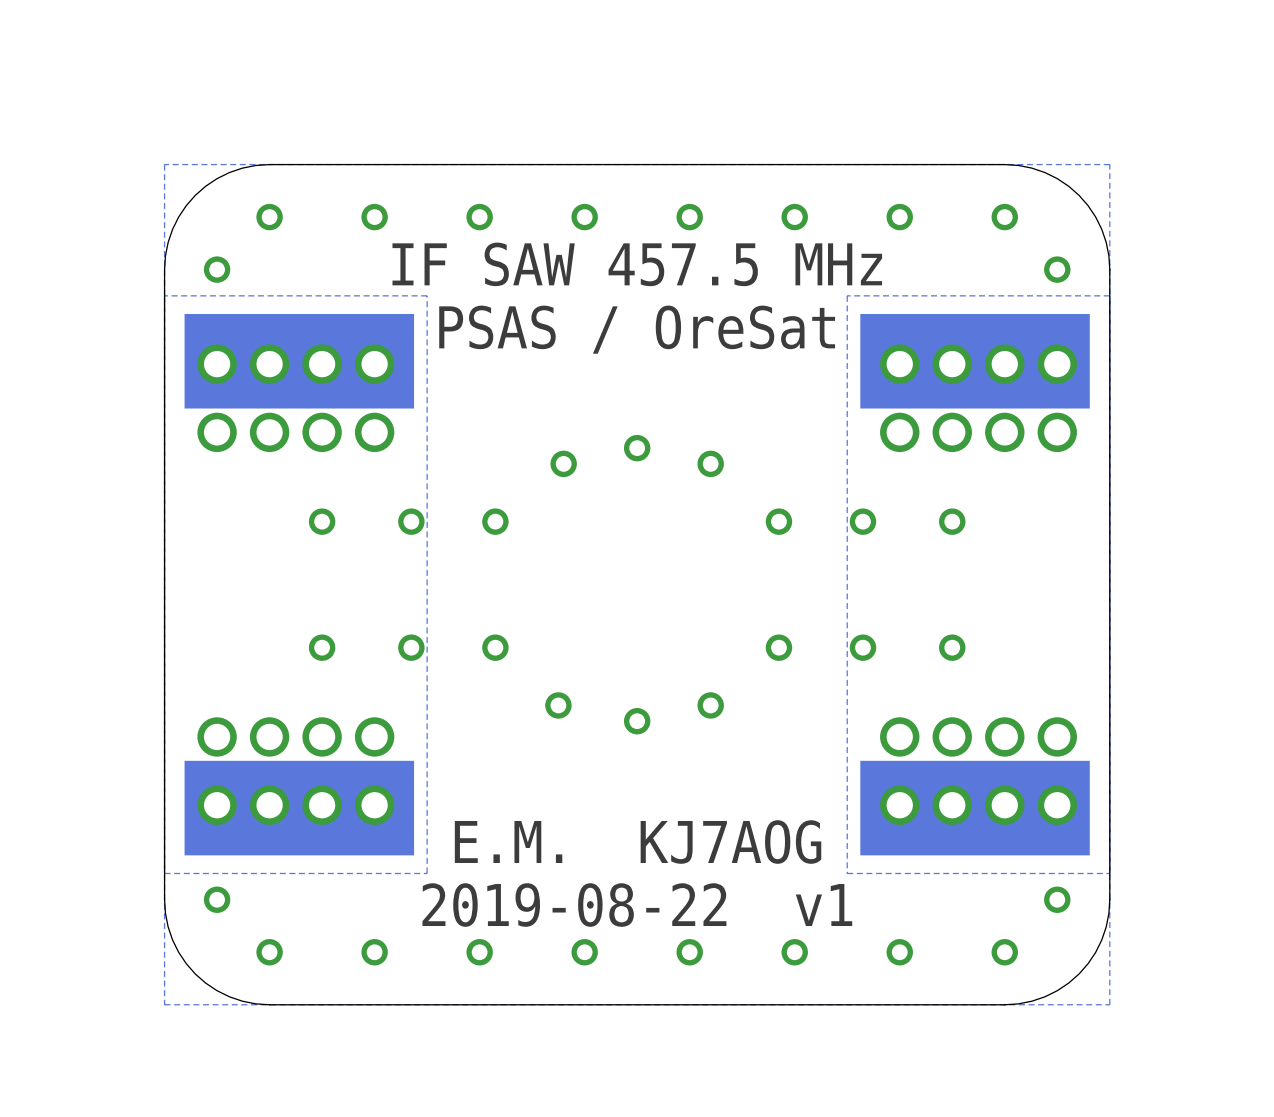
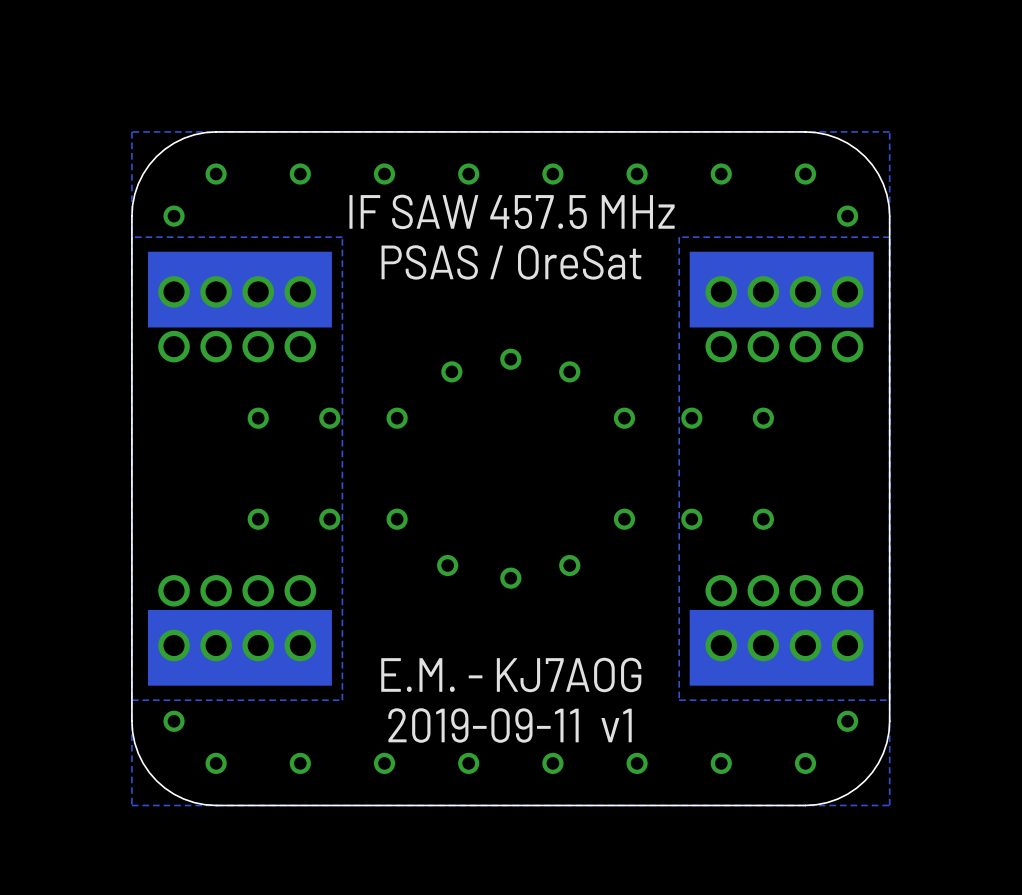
text: E.M. KJ7AOG (638, 842) -> E.M. - KJ7AOG (511, 674)
text: 2019-08-22 v1 (637, 905) -> 2019-09-11 v1 (510, 725)

